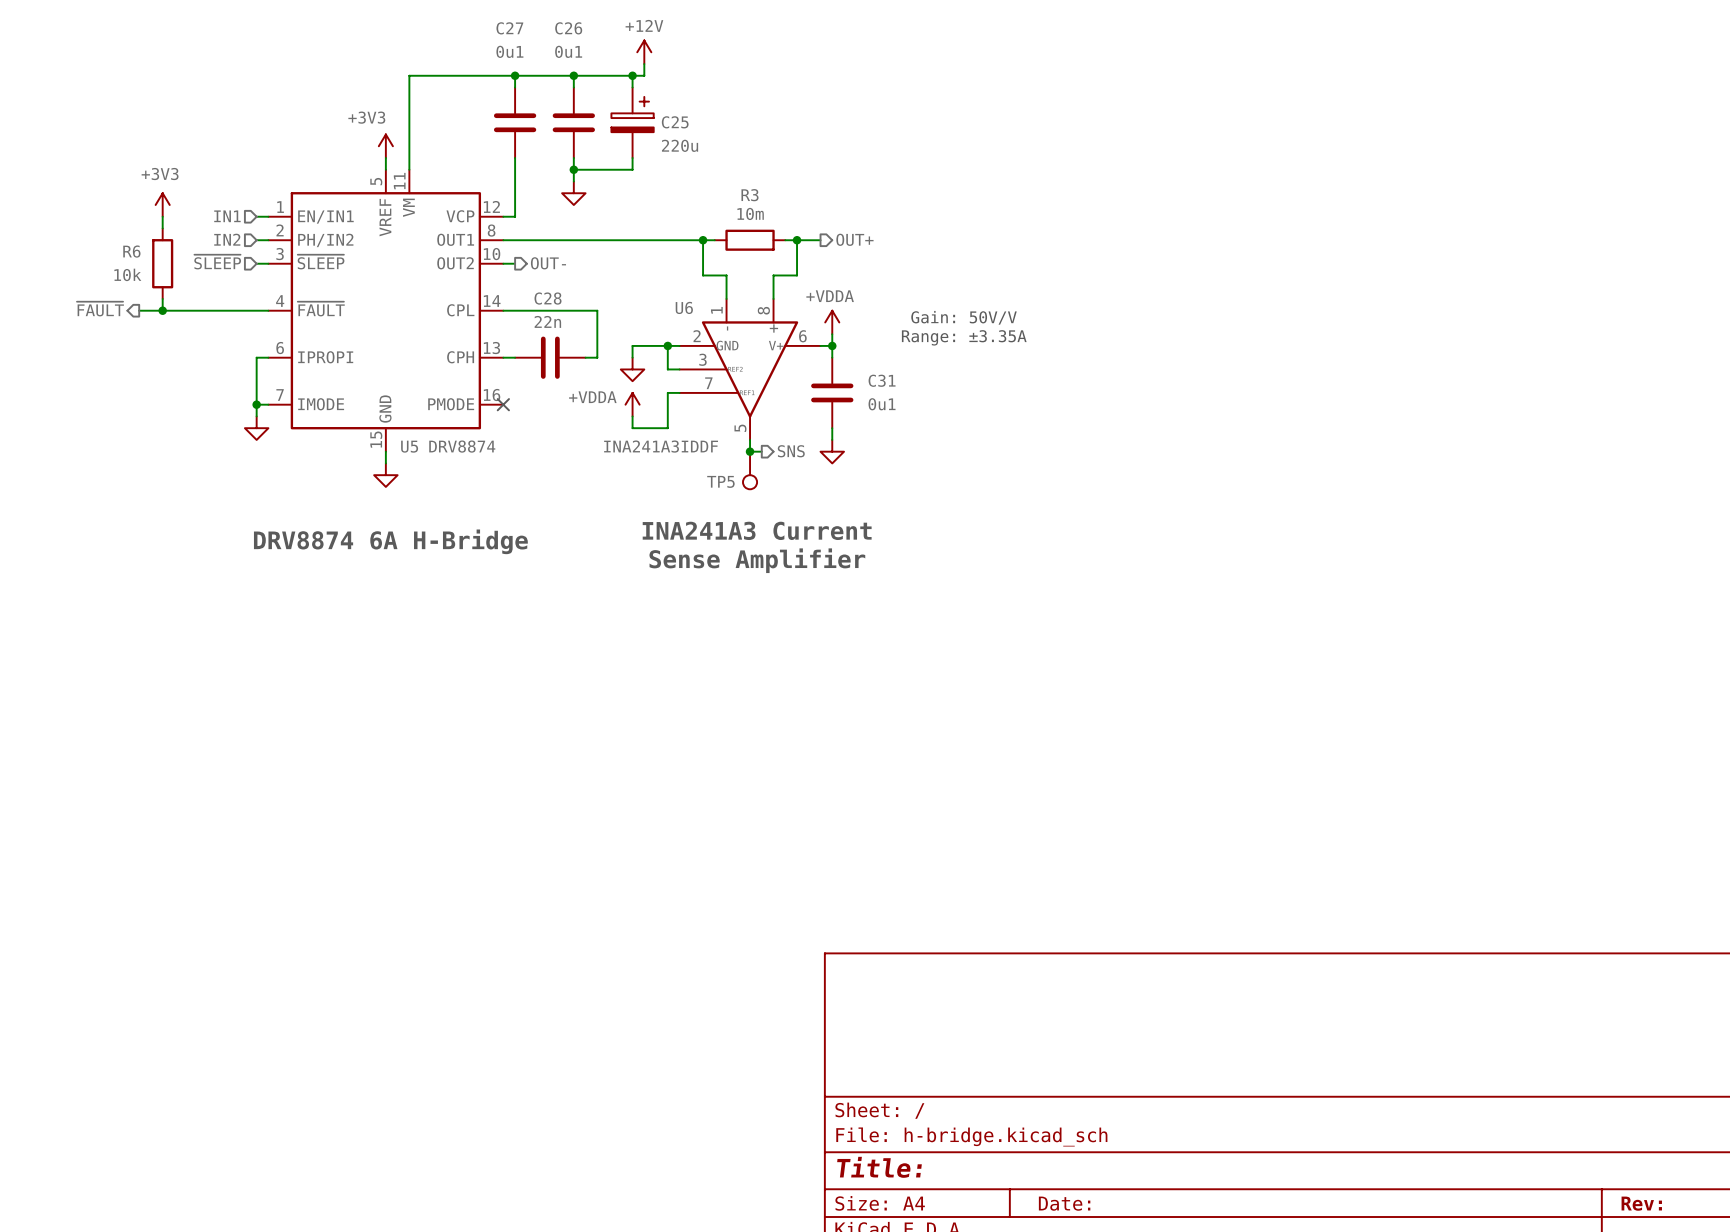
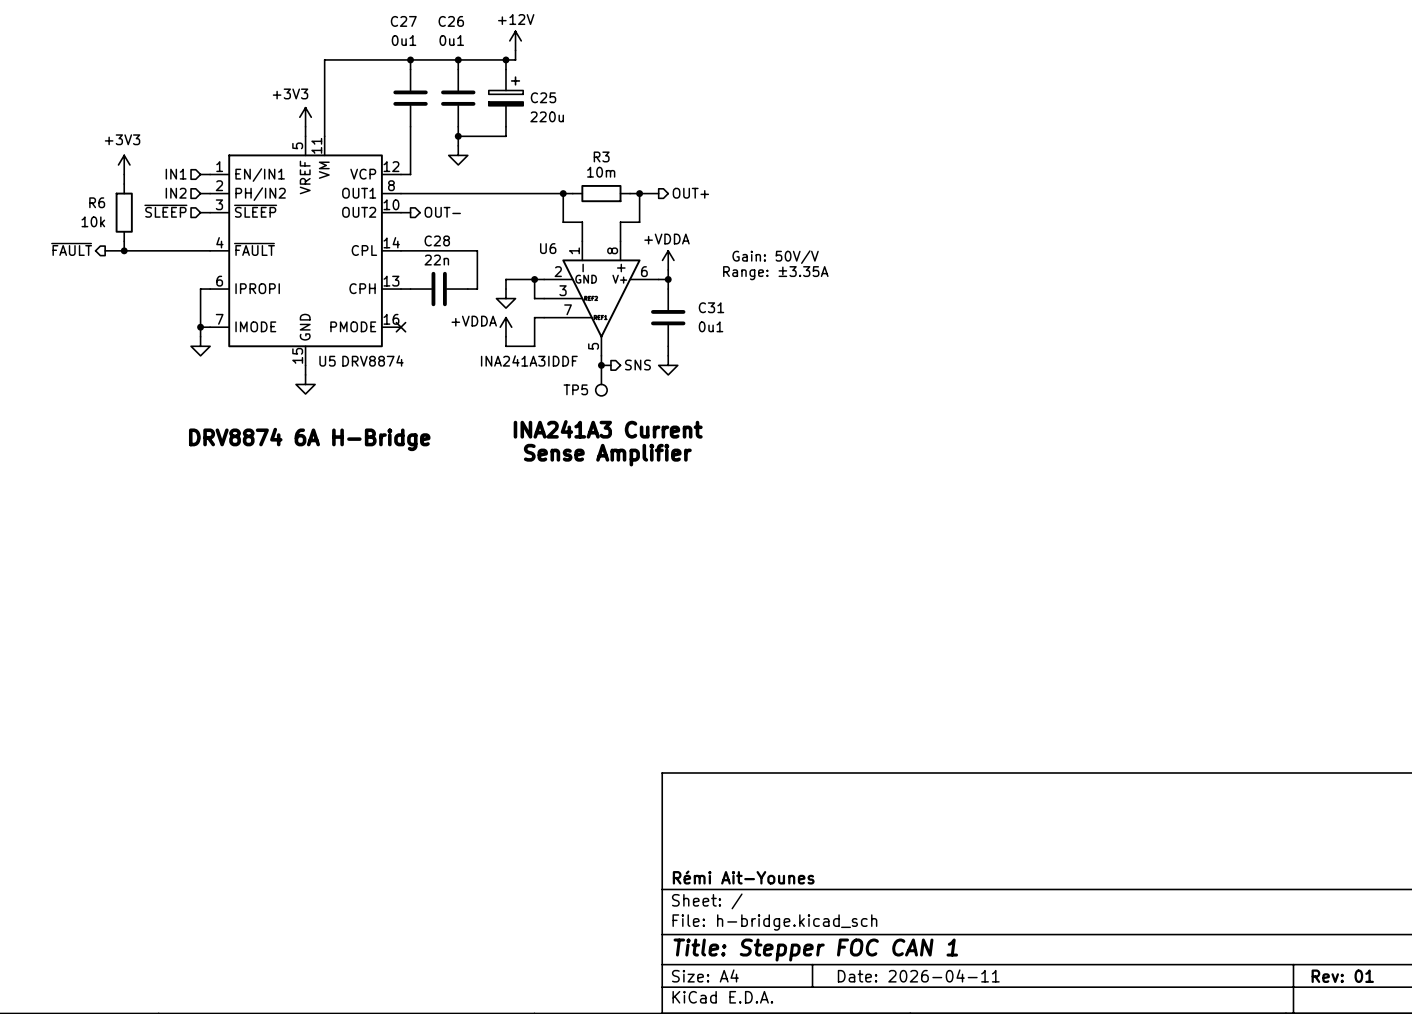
title block: none -> Rémi Ait-Younes (743, 877)
title block: Title: (879, 1167) -> Title: Stepper FOC CAN 1 (815, 950)
title block: Date: (1064, 1203) -> Date: 2026-04-11 (918, 975)
title block: Rev: (1641, 1203) -> Rev: 01 (1342, 976)

